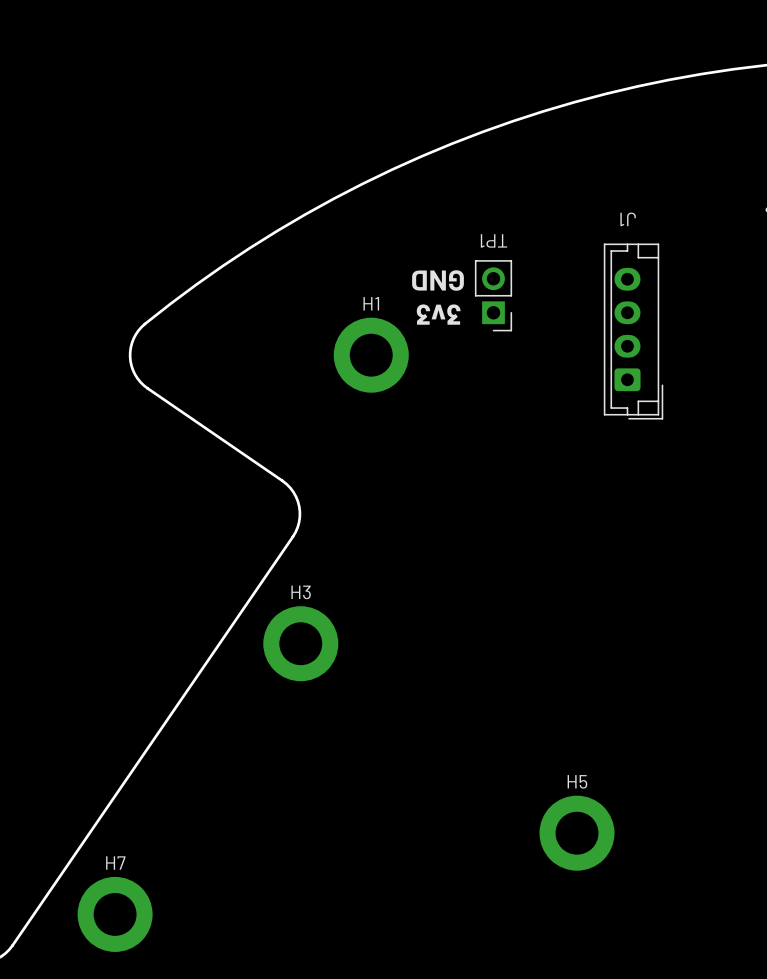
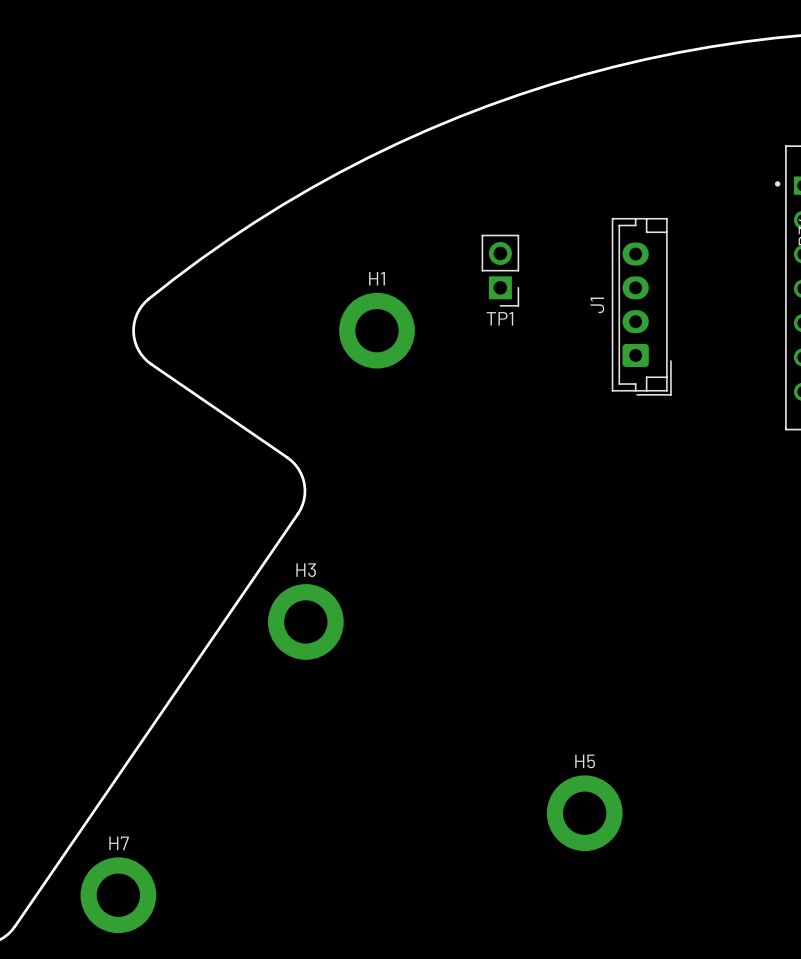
J1 name rotation: 0° (628, 219) -> 90° clockwise (597, 305)
J1 name position: J1 (628, 219) -> J1 (597, 305)
TP1 name rotation: 0° (493, 240) -> 180° (499, 318)
TP1 name position: TP1 (493, 240) -> TP1 (499, 318)
text: GND (438, 280) -> none
text: 3v3 (438, 314) -> none

